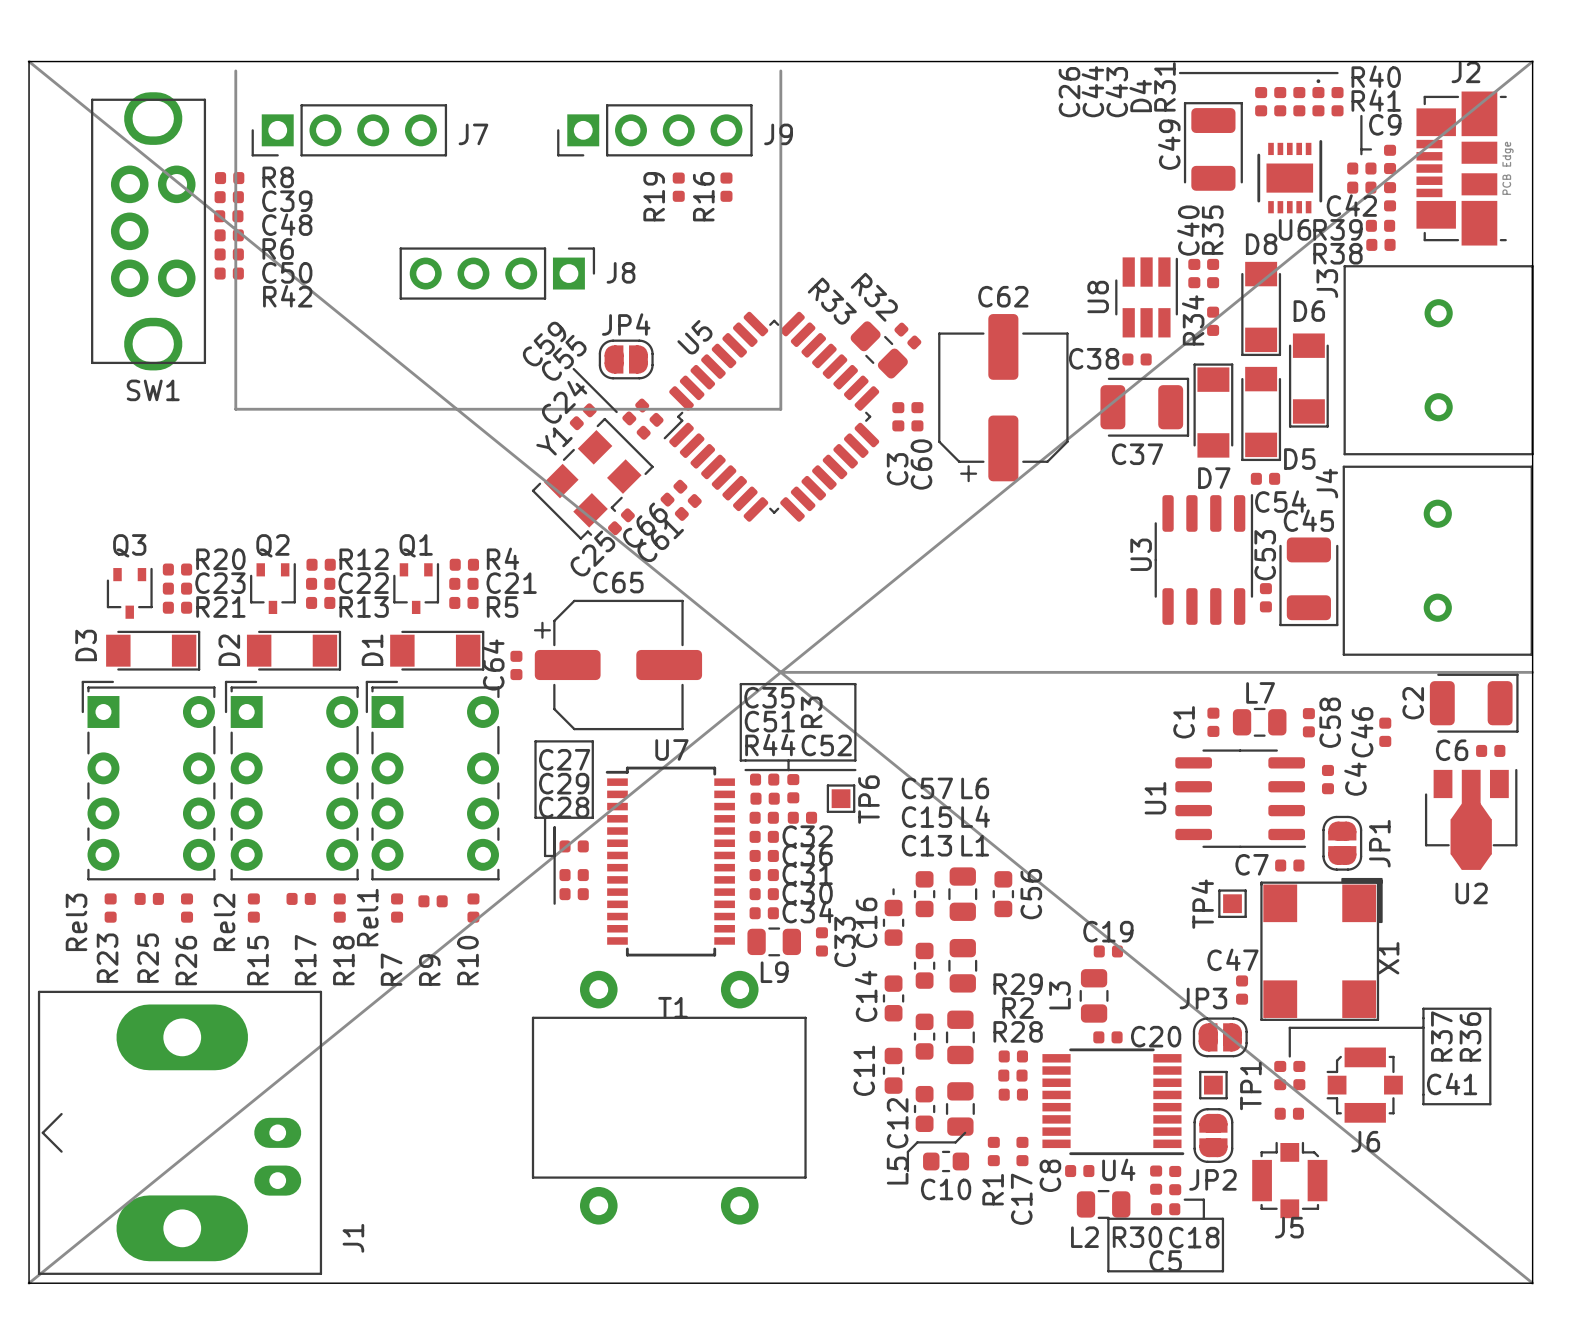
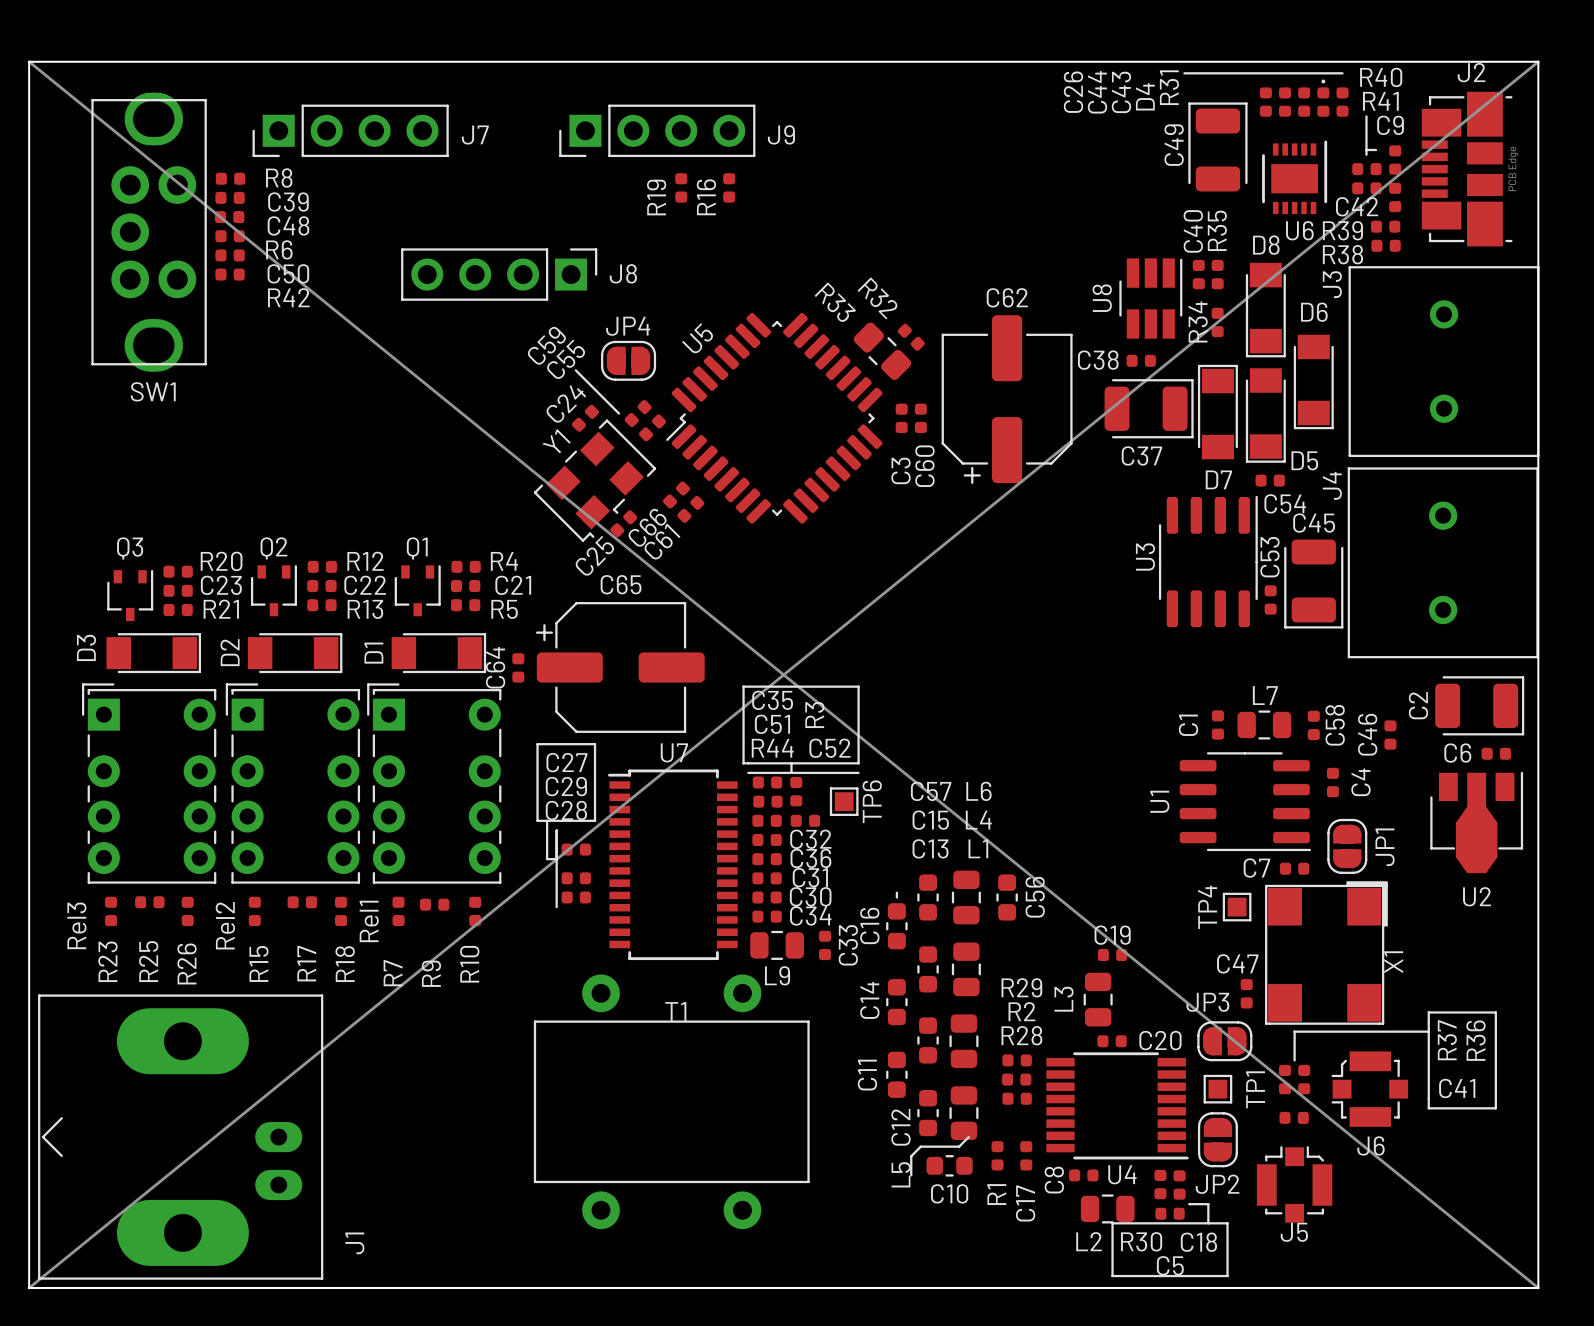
line: (235, 70) (235, 409) (780, 409) (780, 70) -> none
line: (780, 672) (1532, 672) -> none

